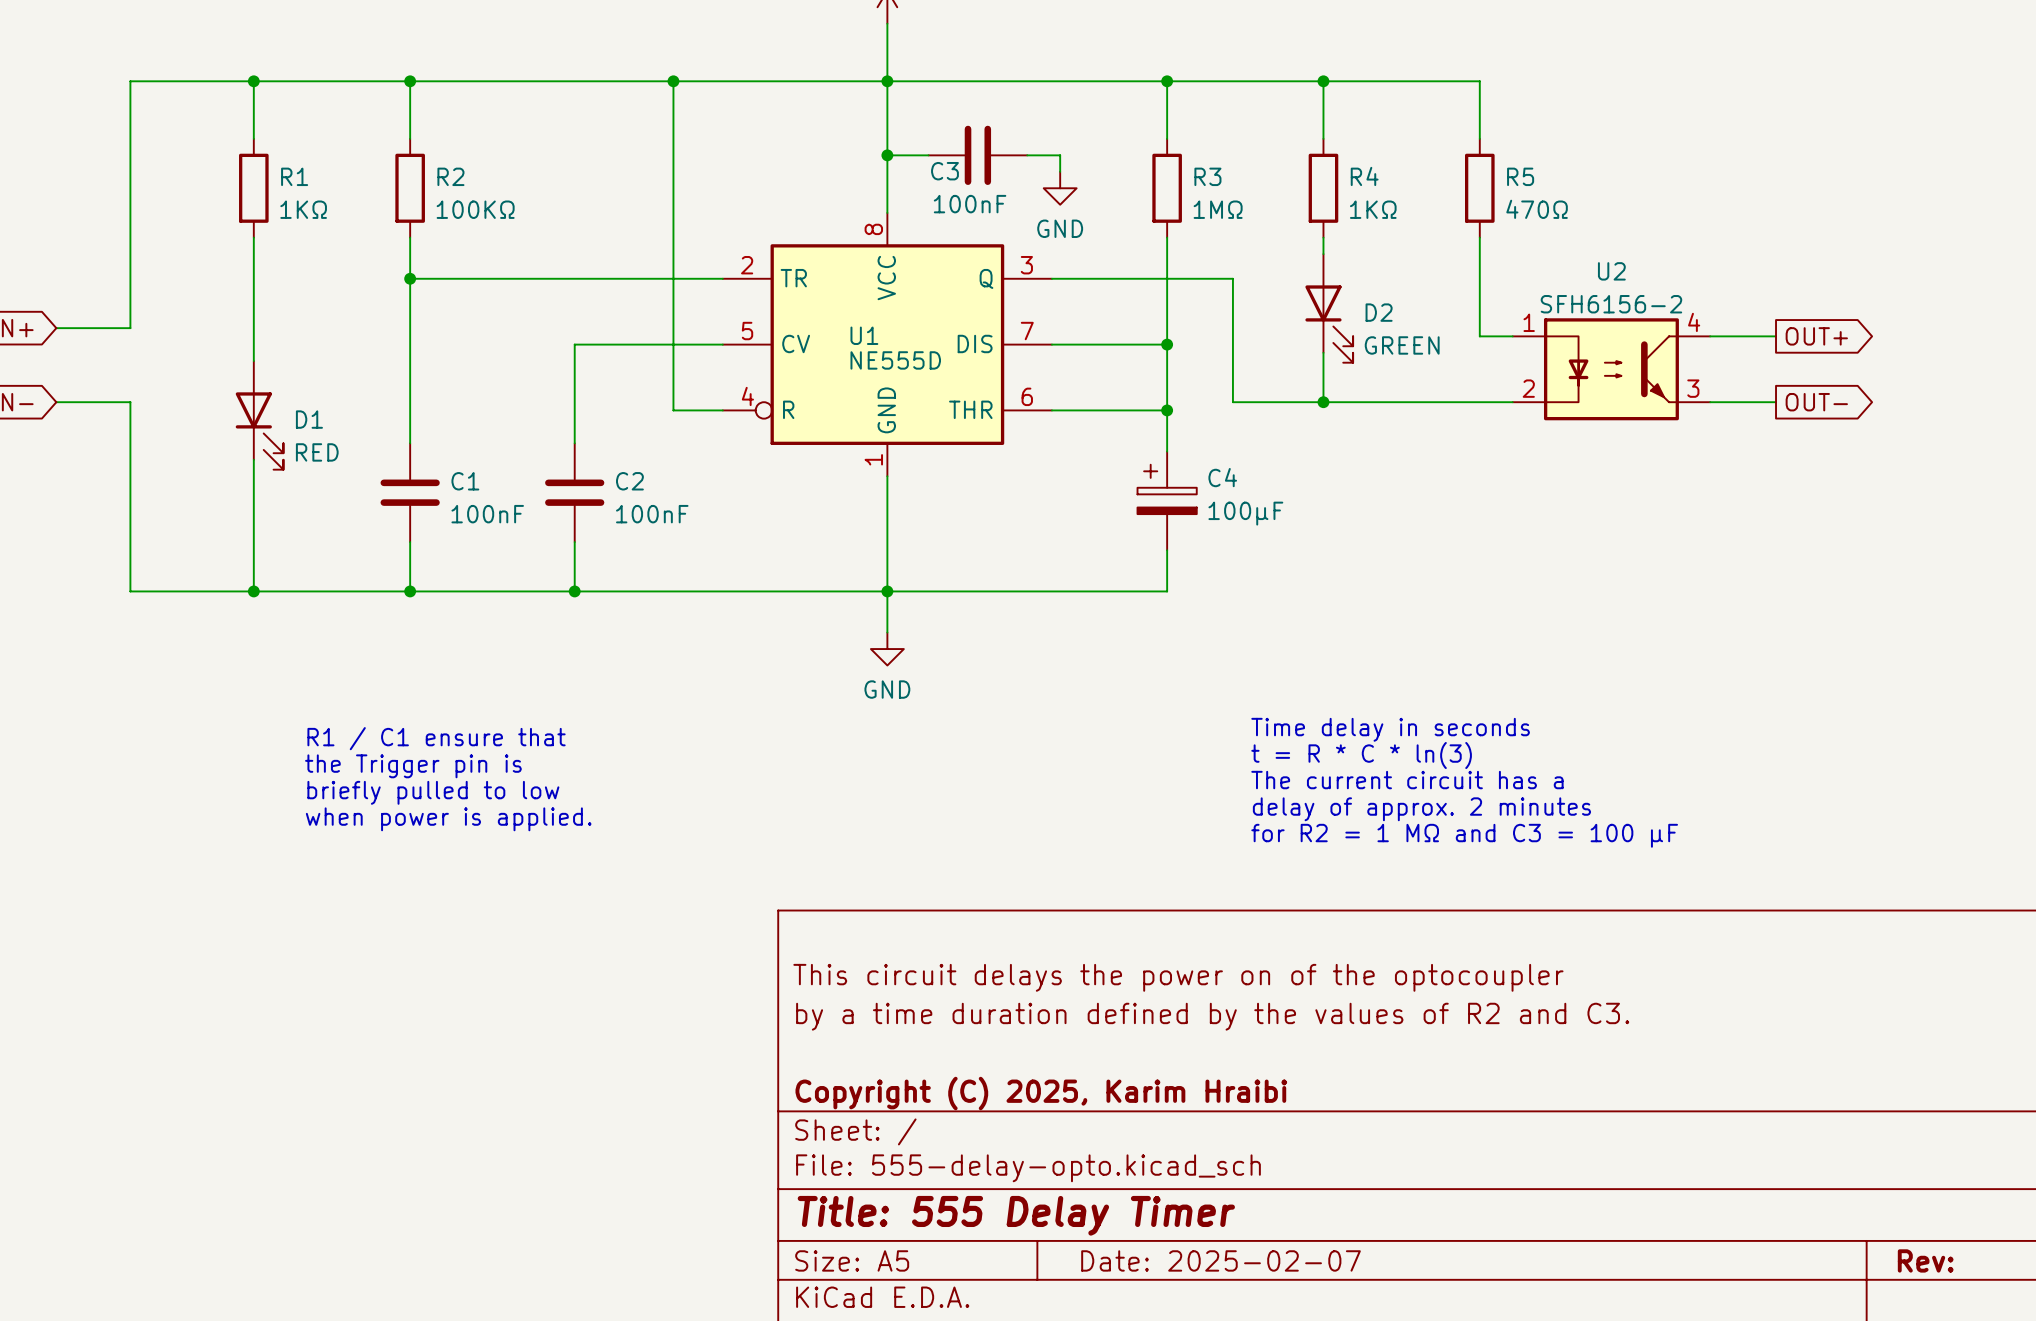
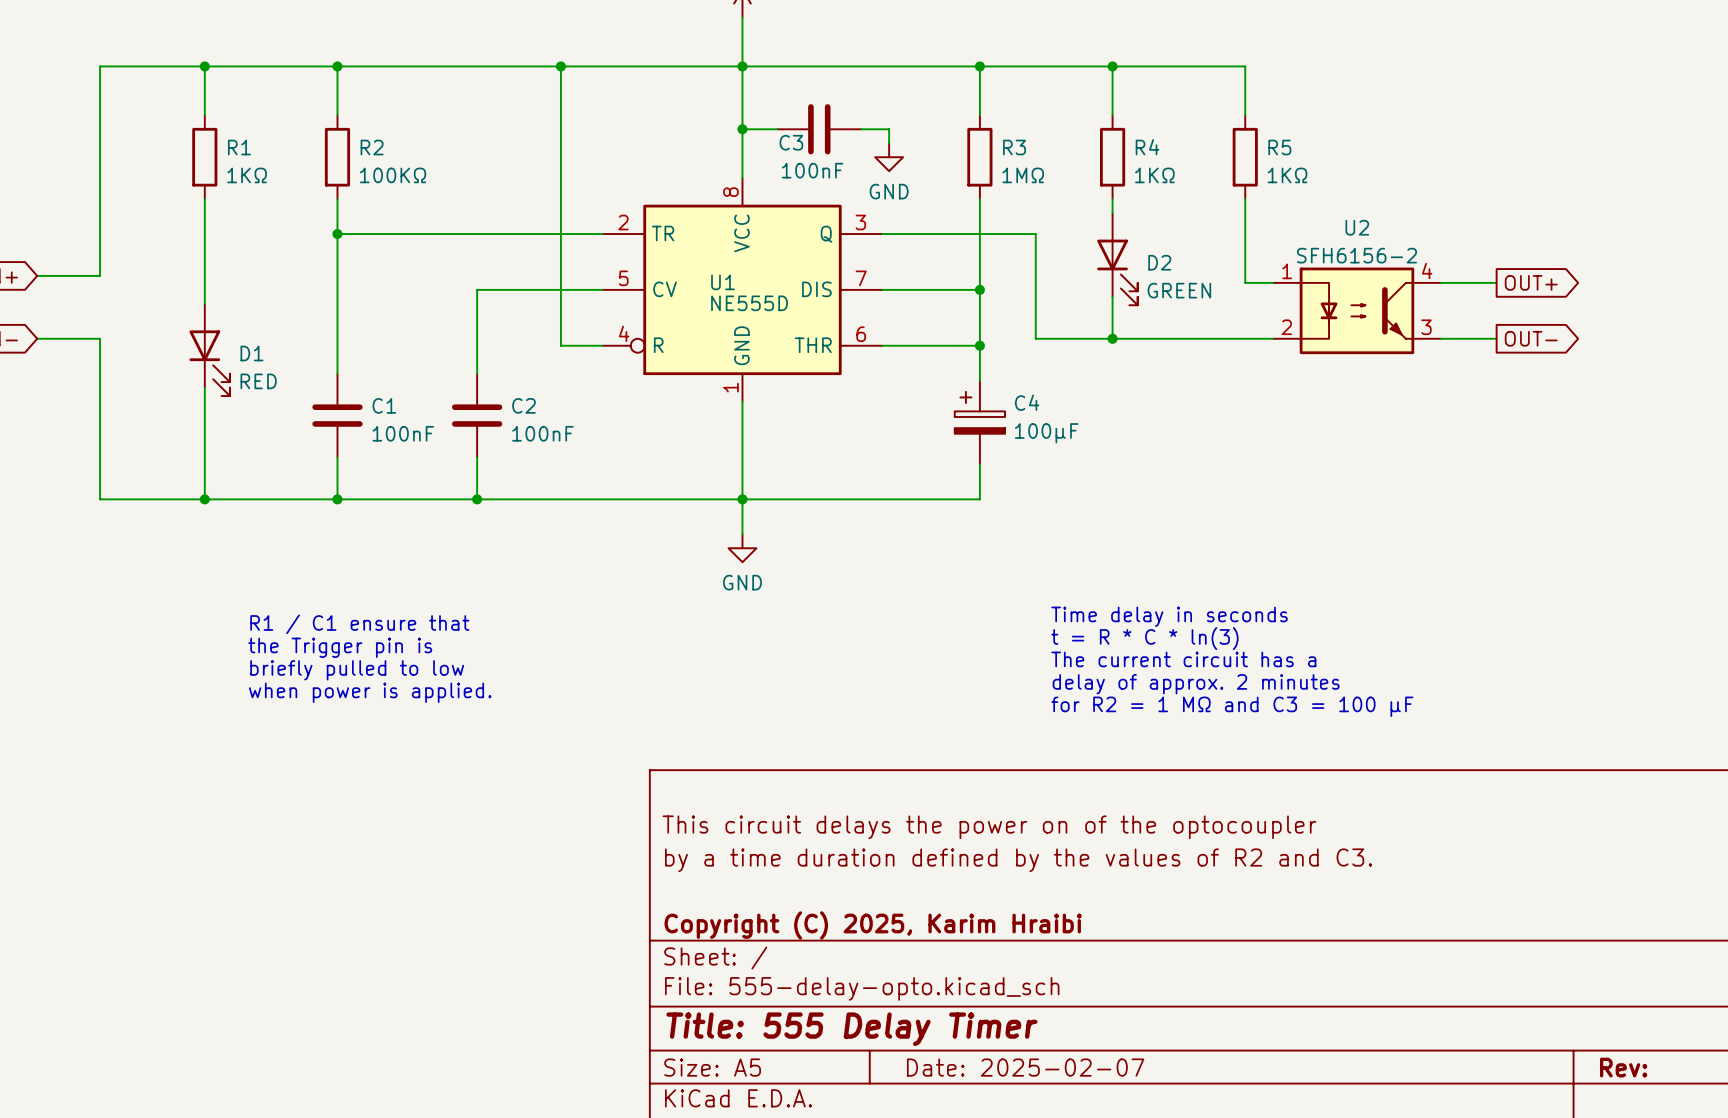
R5 value: 470Ω (1537, 209) -> 1KΩ (1287, 175)

